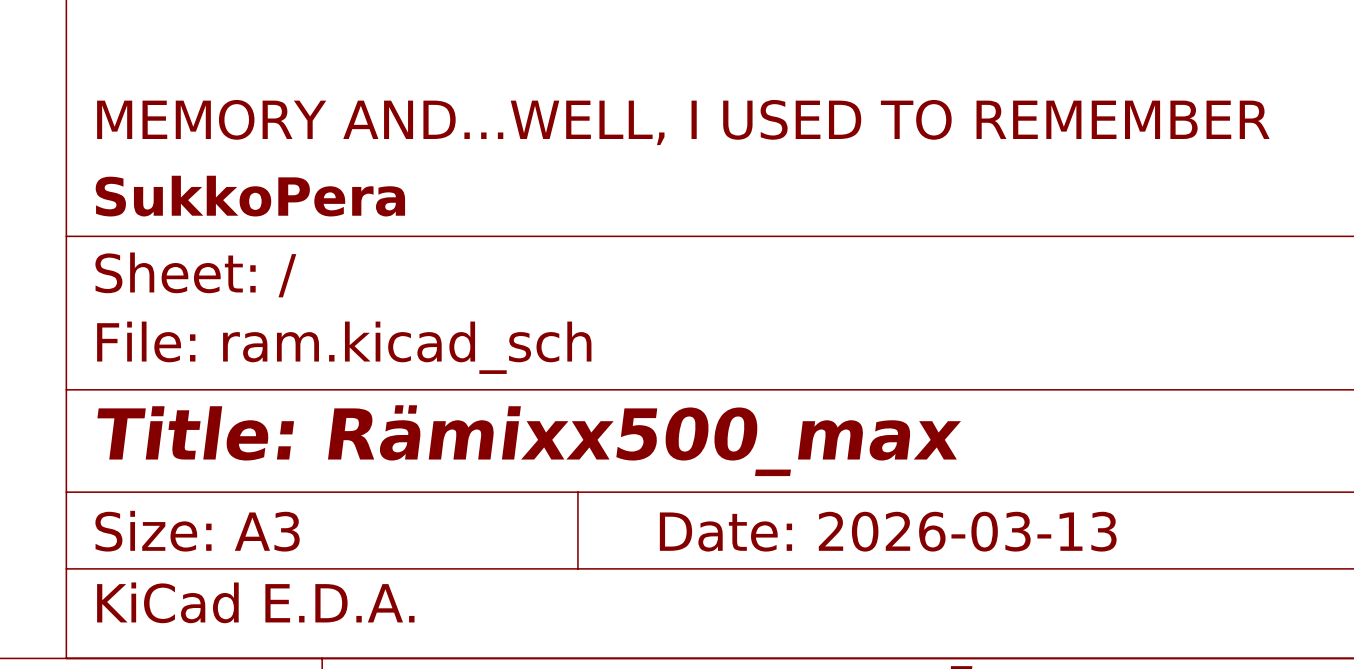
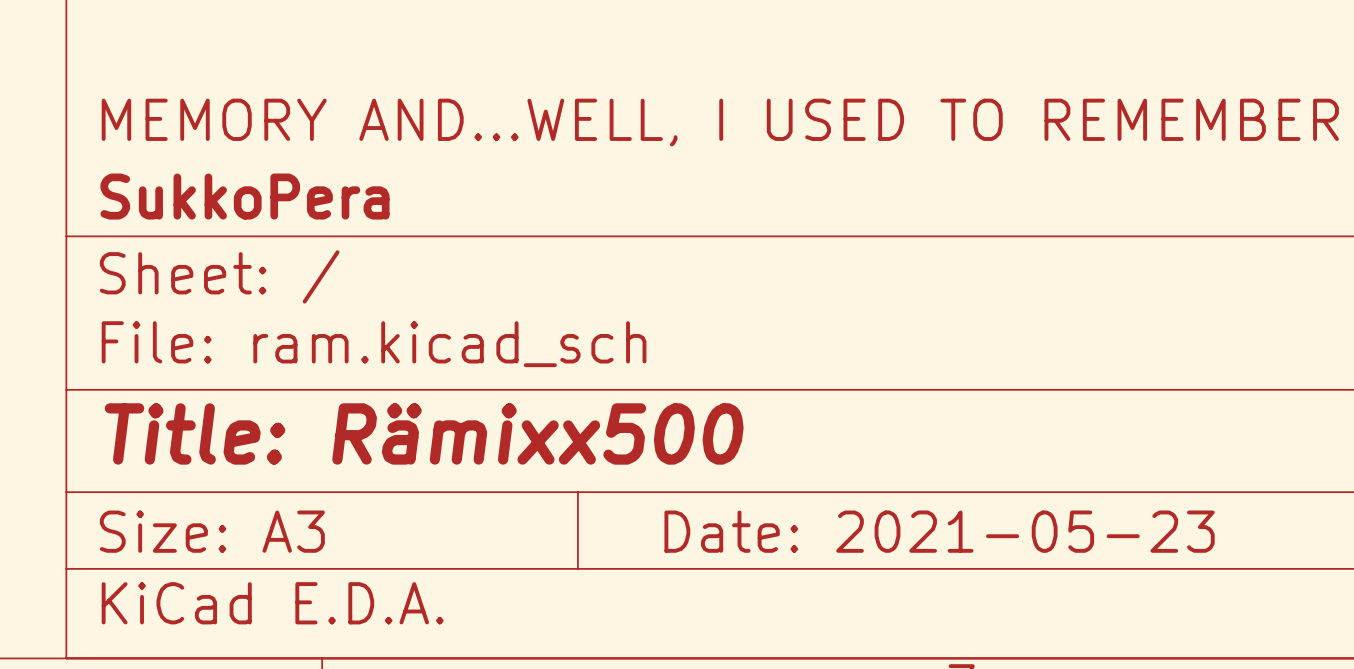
title block: Title: Rämixx500_max (529, 440) -> Title: Rämixx500 (424, 433)
title block: Date: 2026-03-13 (888, 531) -> Date: 2021-05-23 (939, 531)

